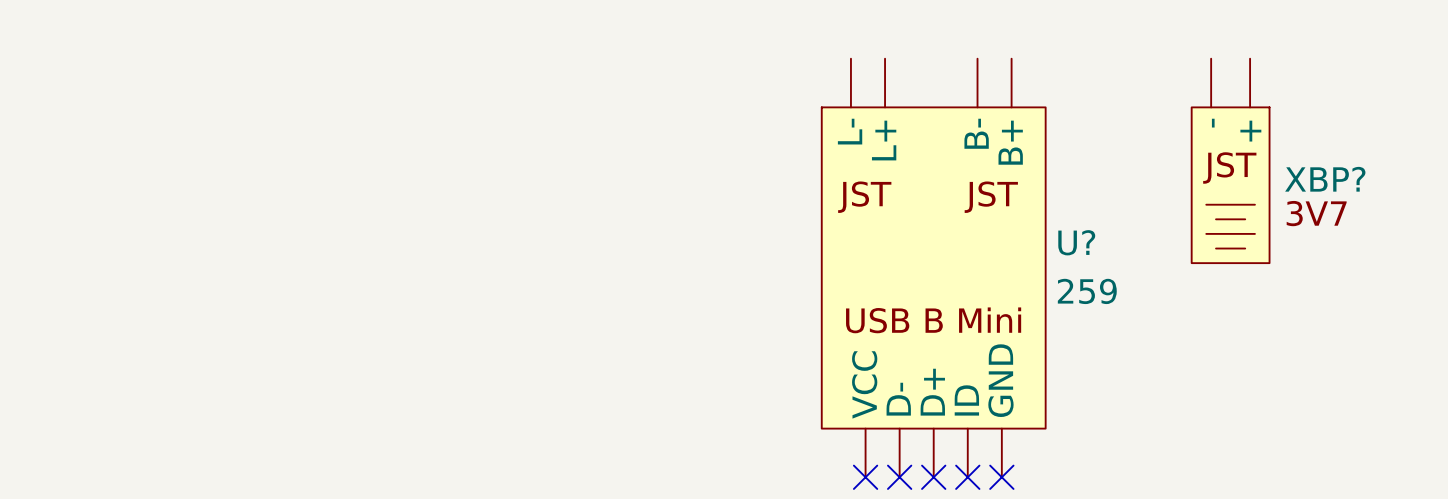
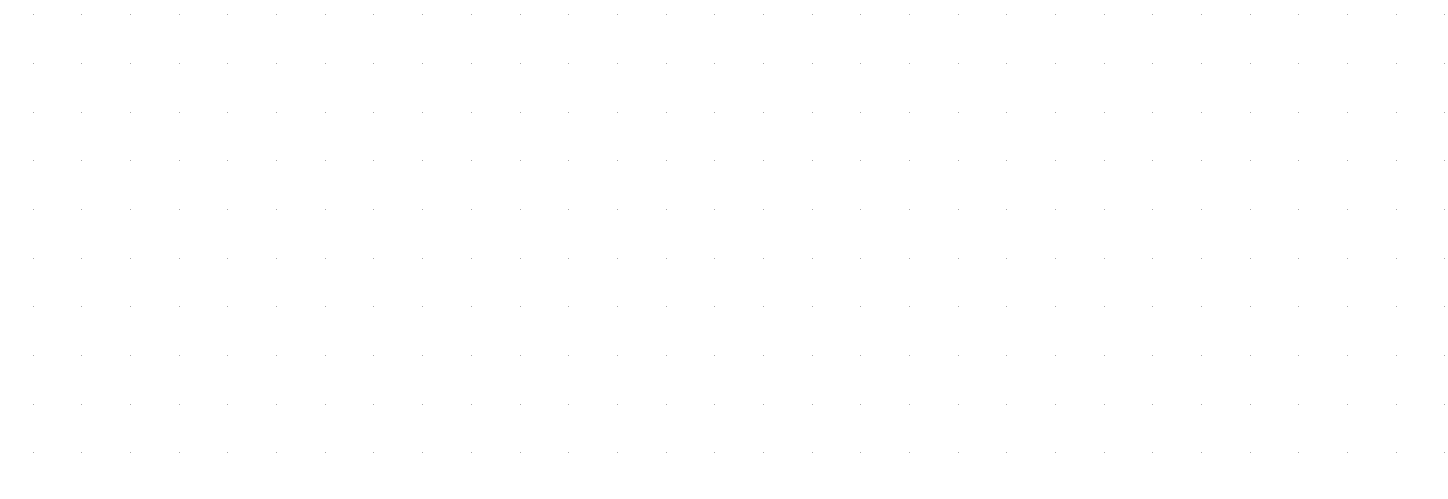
XBP?: (1230, 160) -> none
U?: 259 (933, 267) -> none
no-connect mark: (865, 477) -> none
no-connect mark: (899, 477) -> none
no-connect mark: (933, 477) -> none
no-connect mark: (967, 477) -> none
no-connect mark: (1001, 477) -> none

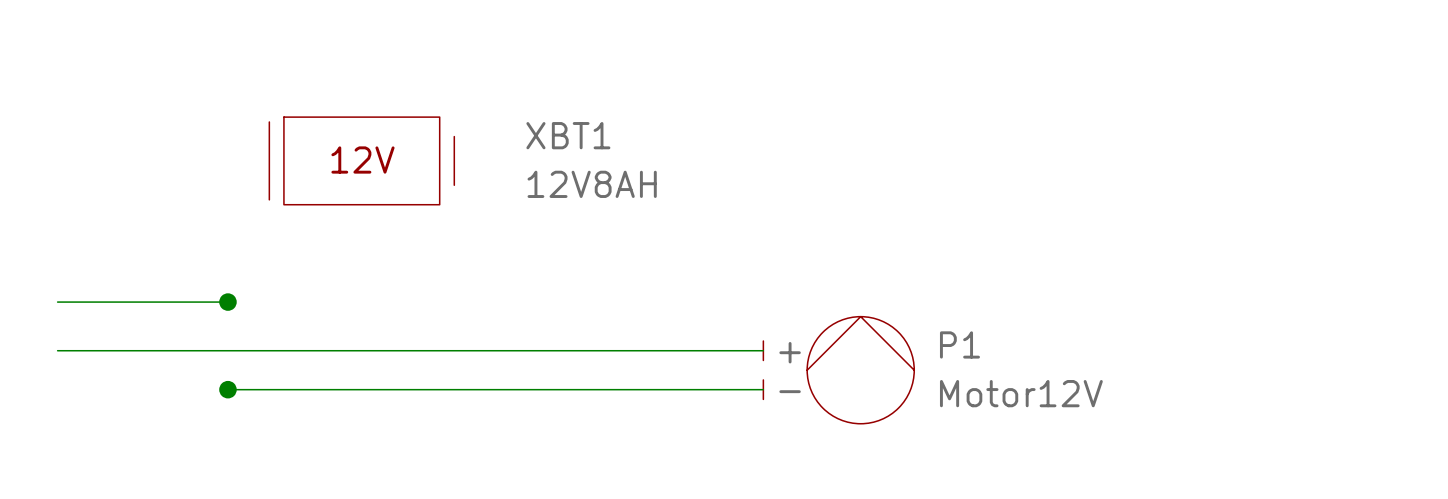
XBT1: none -> 12V8AH (361, 160)
wire: none -> (57, 302) (227, 302)
junction: none -> (227, 302)
wire: none -> (57, 350) (763, 350)
P1: none -> Motor12V (838, 370)
wire: none -> (227, 389) (763, 389)
junction: none -> (227, 389)

